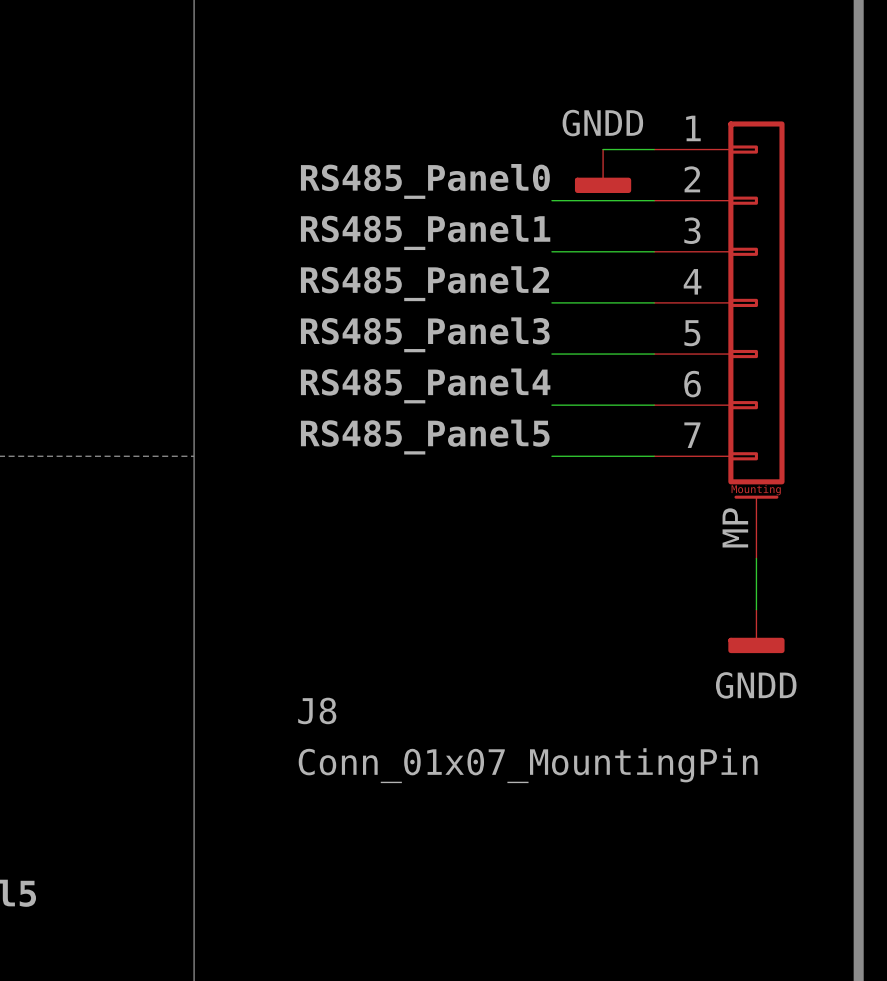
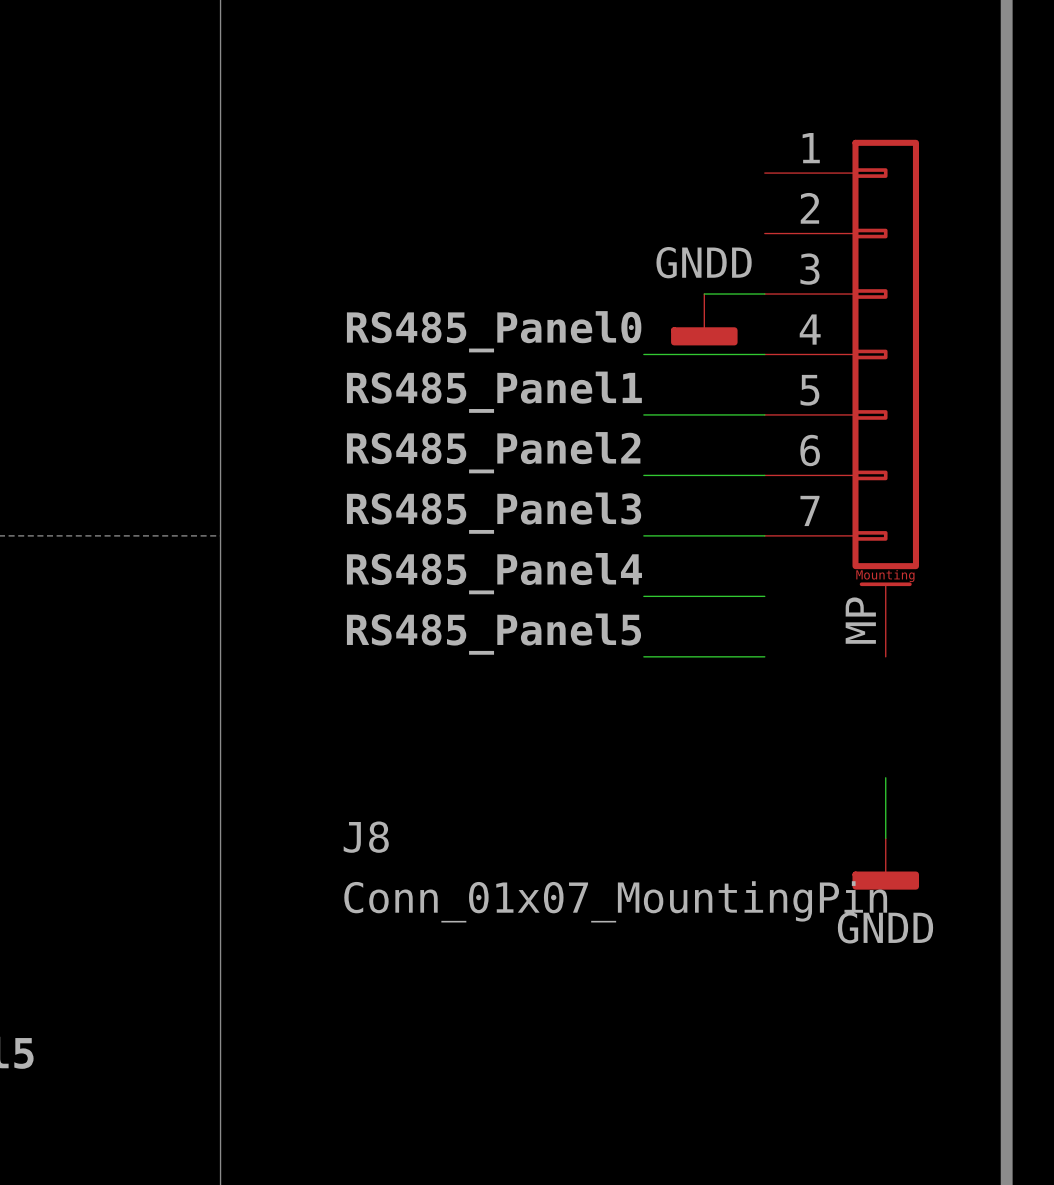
wire: (603, 149) (654, 149) -> none
power symbol position: GNDD (603, 171) -> GNDD (704, 319)
label: RS485_Panel0 (425, 181) -> none
wire: (551, 200) (654, 200) -> (643, 596) (764, 596)
label: RS485_Panel1 (425, 232) -> none
wire: (551, 251) (603, 251) -> none
label: RS485_Panel2 (424, 283) -> RS485_Panel0 (494, 331)
label: RS485_Panel3 (425, 334) -> RS485_Panel1 (494, 392)
label: RS485_Panel4 (425, 385) -> RS485_Panel2 (493, 452)
label: RS485_Panel5 (425, 437) -> RS485_Panel3 (494, 513)
label: none -> RS485_Panel4 (494, 573)
label: none -> RS485_Panel5 (493, 634)
wire: none -> (643, 656) (764, 656)
wire: (756, 558) (756, 609) -> (885, 777) (885, 838)
power symbol position: GNDD (756, 631) -> GNDD (885, 863)

